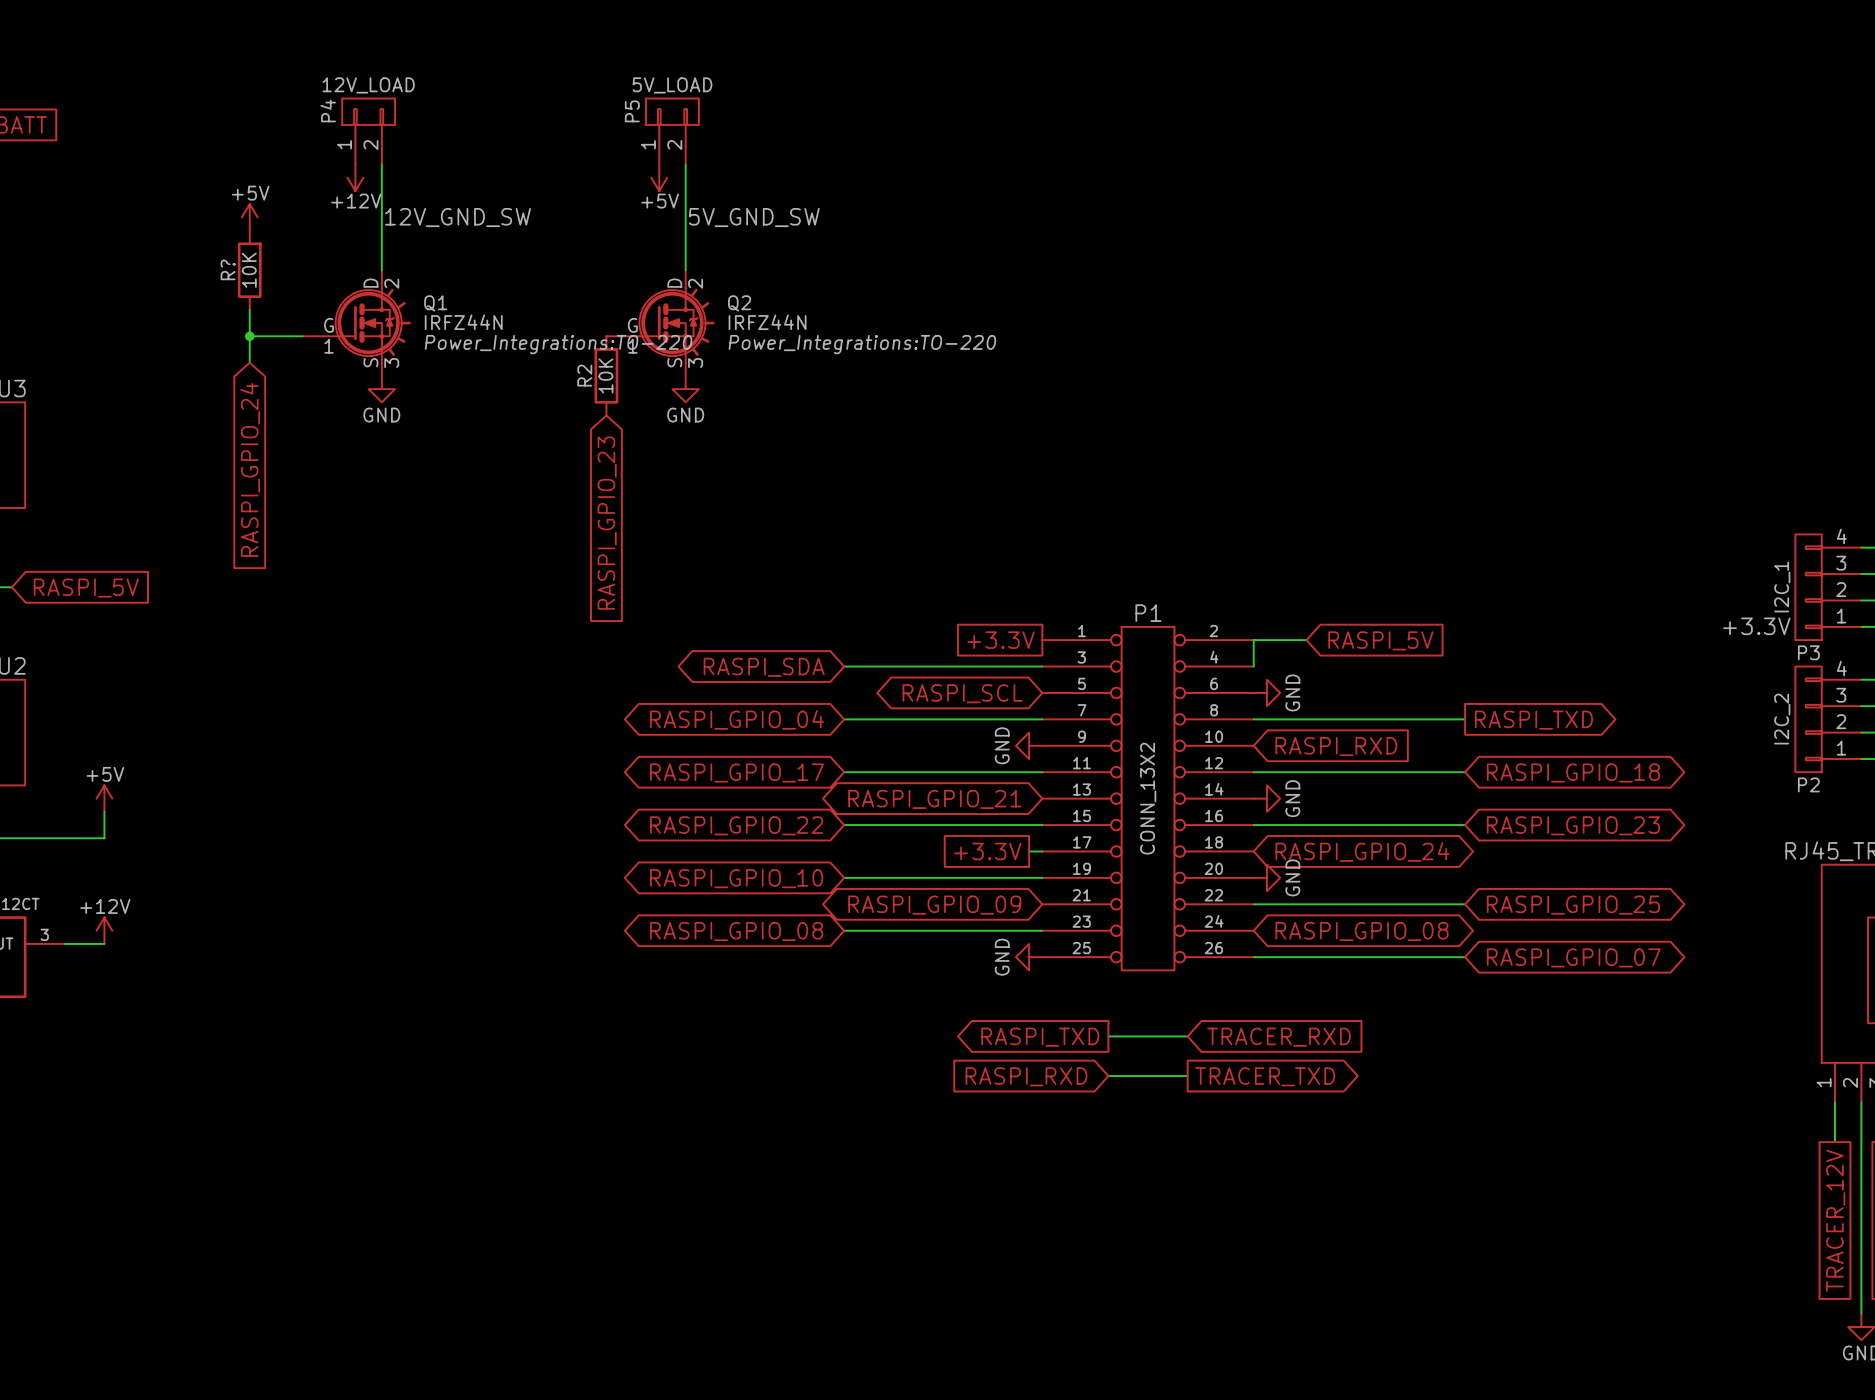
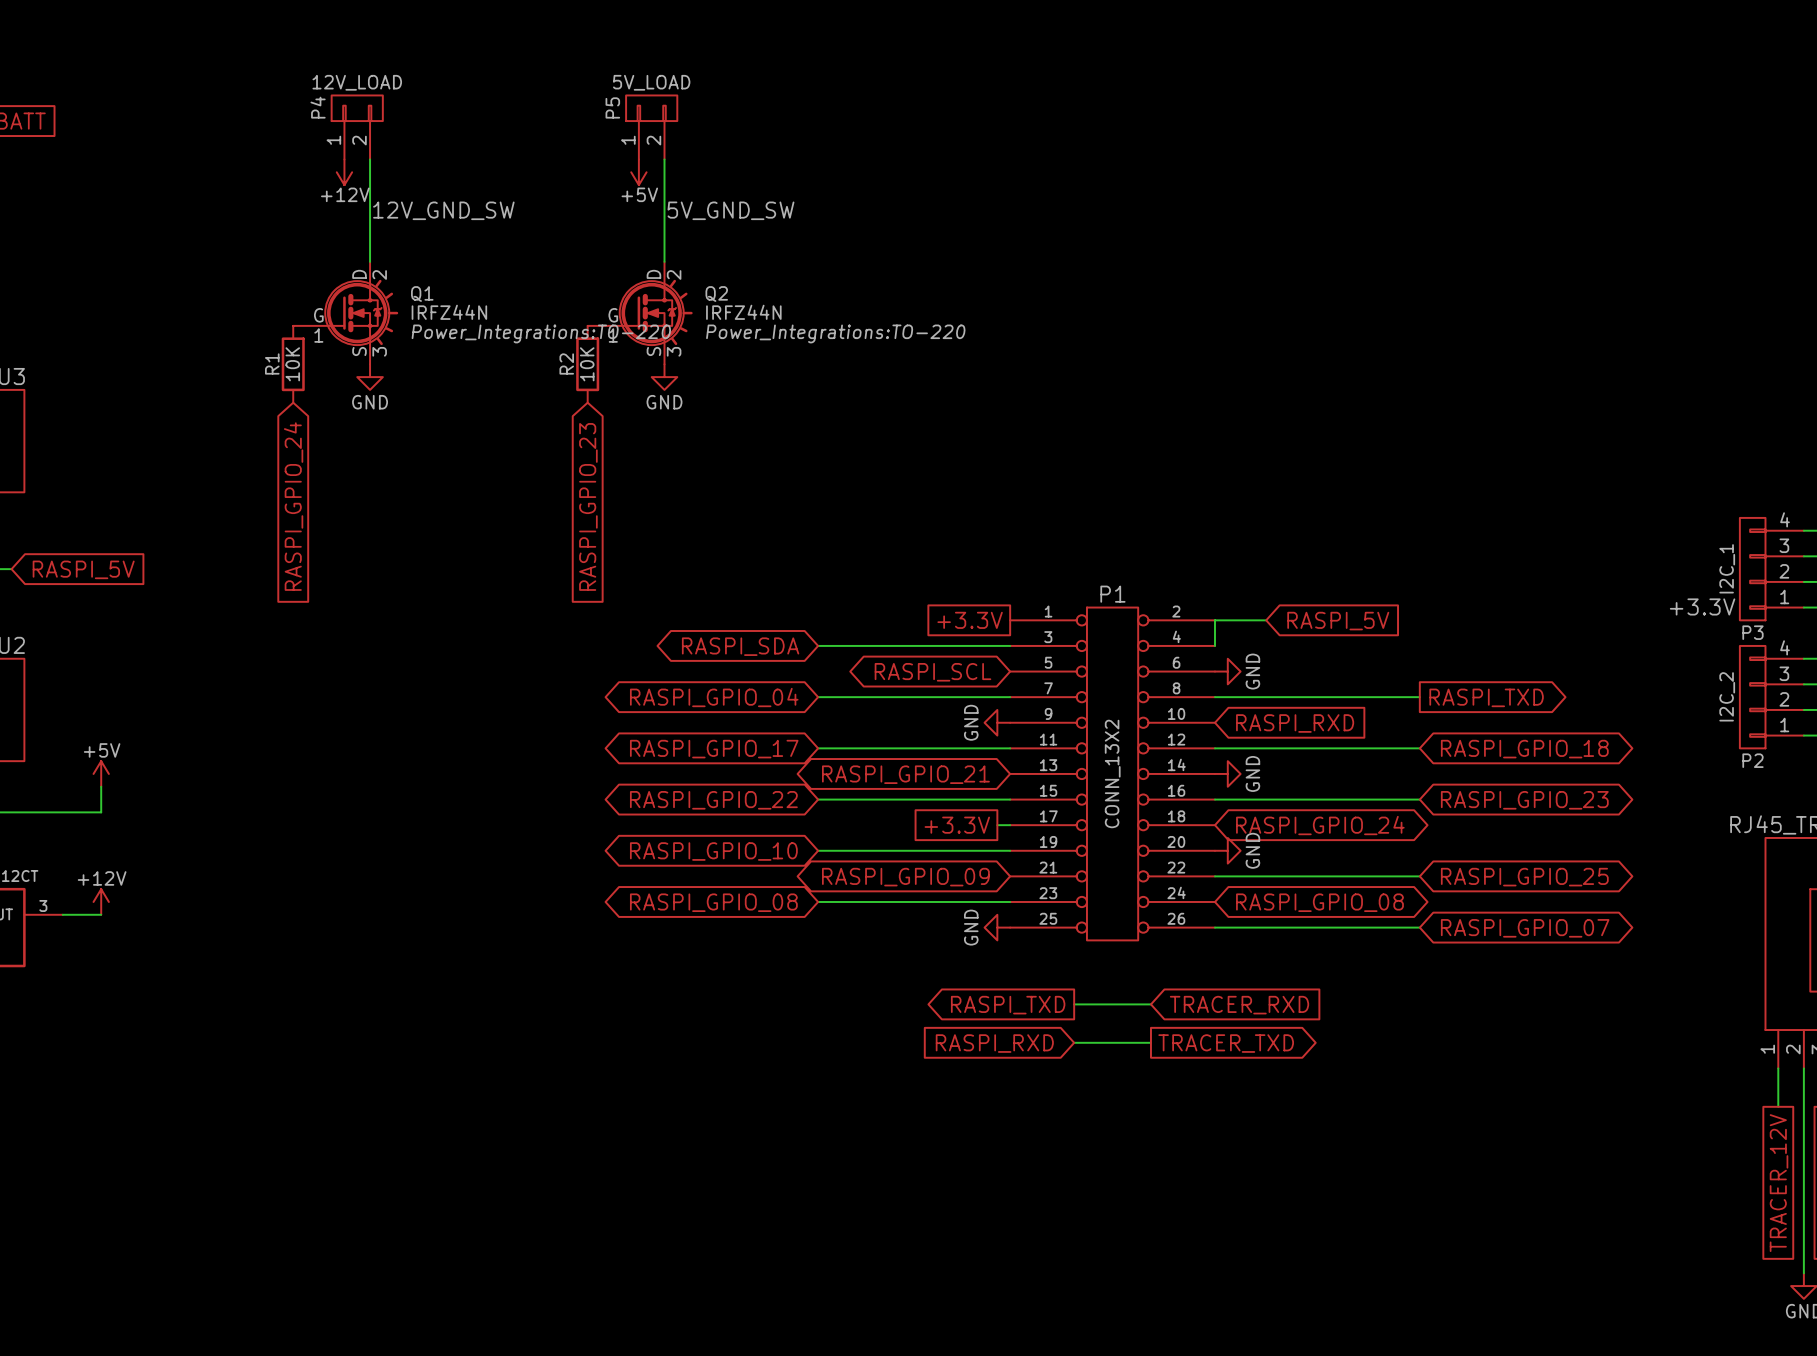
power symbol: +5V (249, 217) -> none
R?: 10K (249, 270) -> none
wire: (249, 309) (249, 362) -> none
wire: (249, 336) (302, 336) -> none
junction: (249, 336) -> none
R1: none -> 10K (293, 364)
global label position: RASPI_GPIO_24 (250, 469) -> RASPI_GPIO_24 (293, 506)

